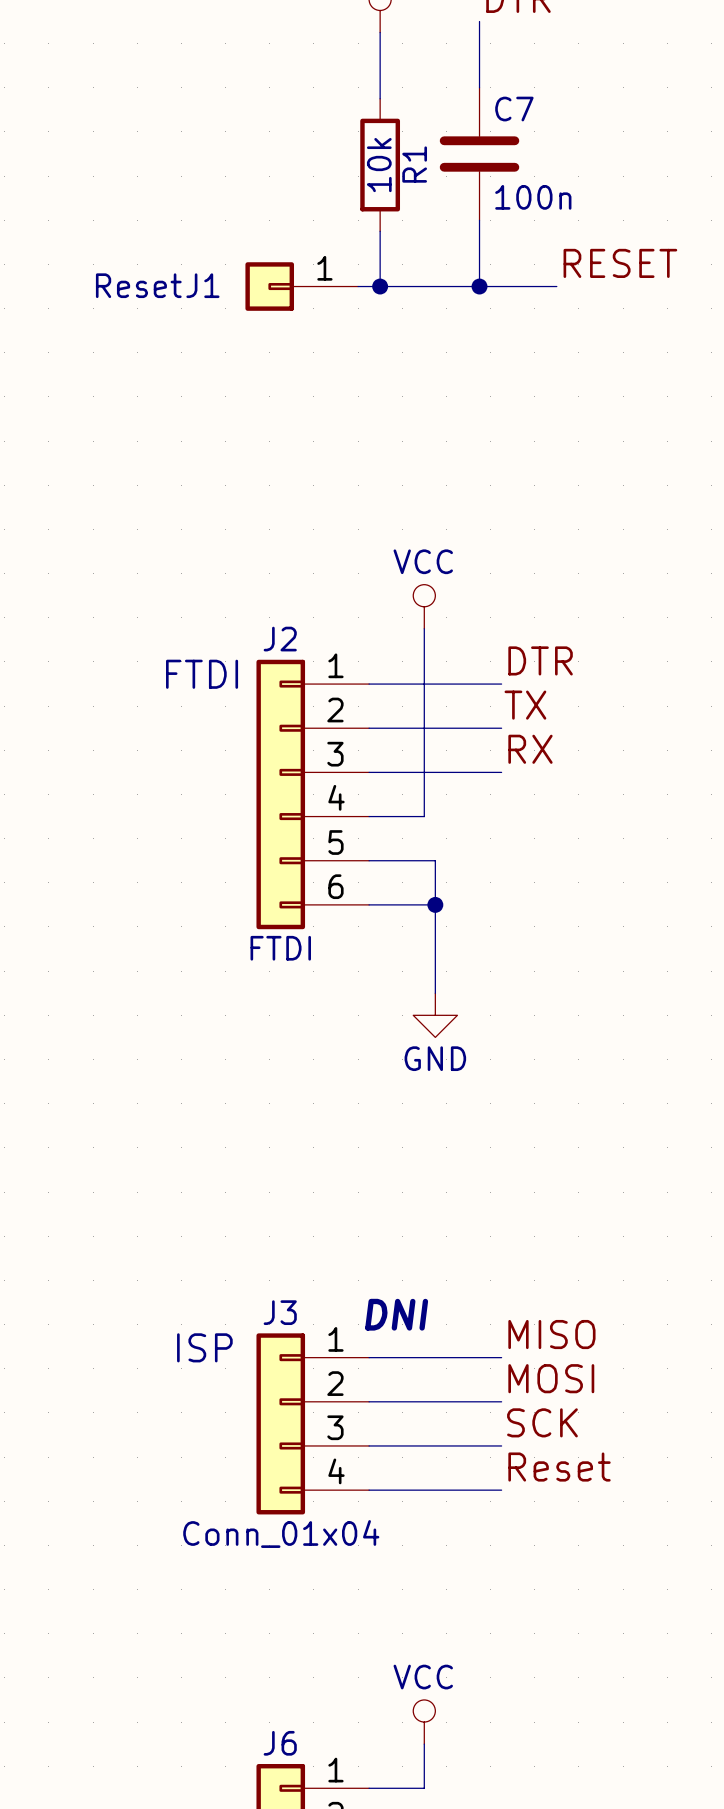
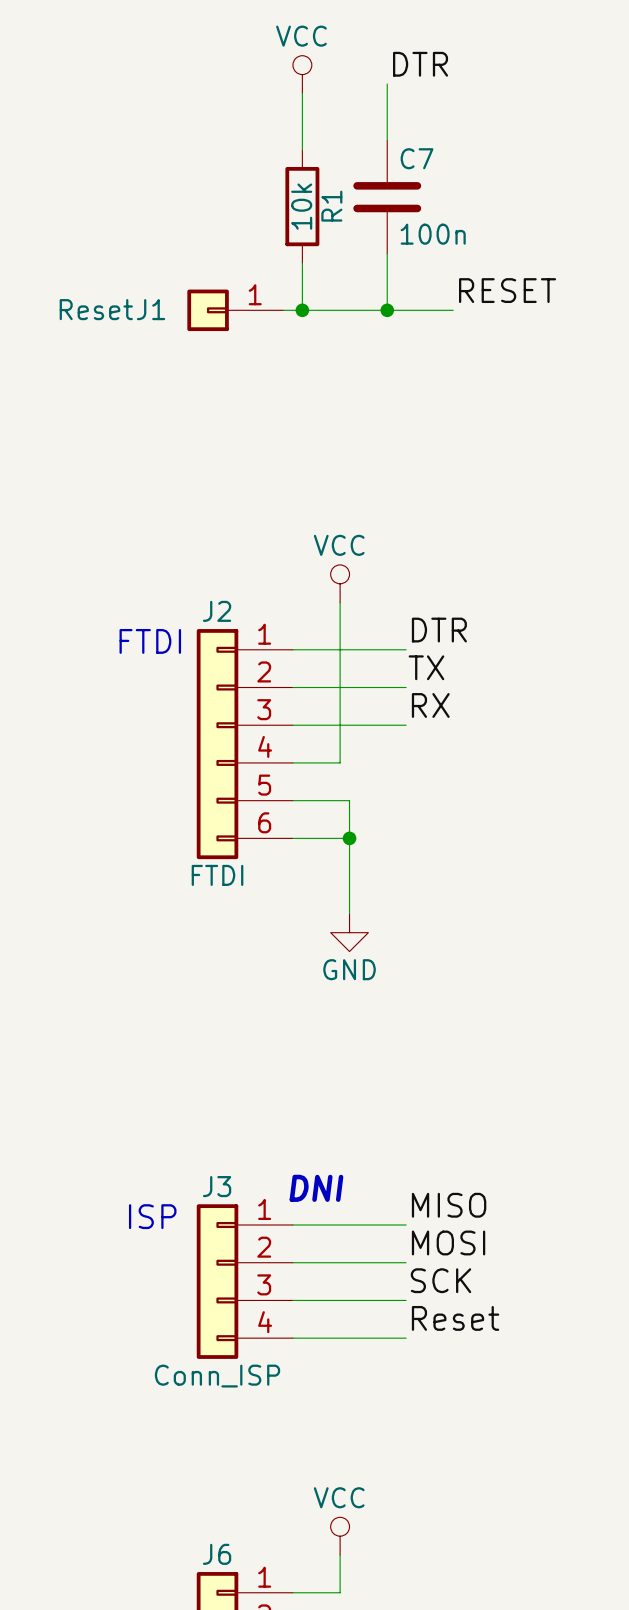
J3 value: Conn_01x04 (281, 1534) -> Conn_ISP (217, 1376)

